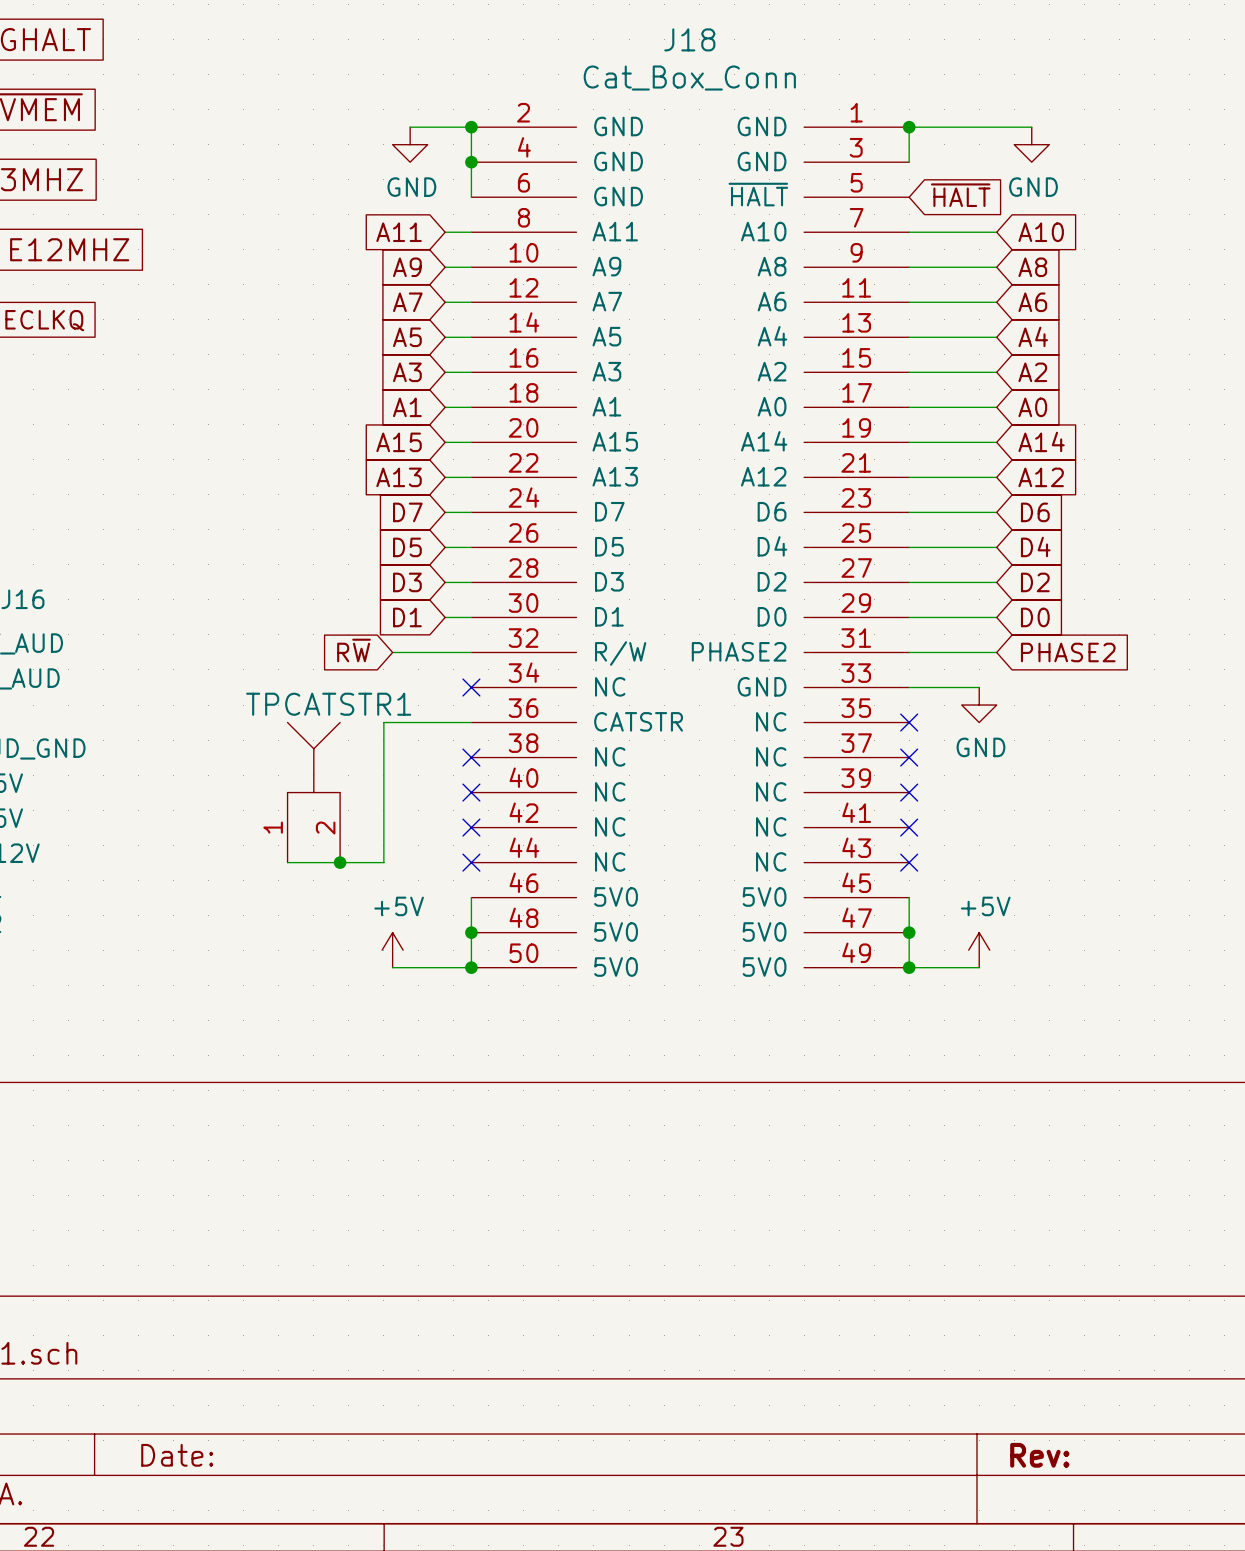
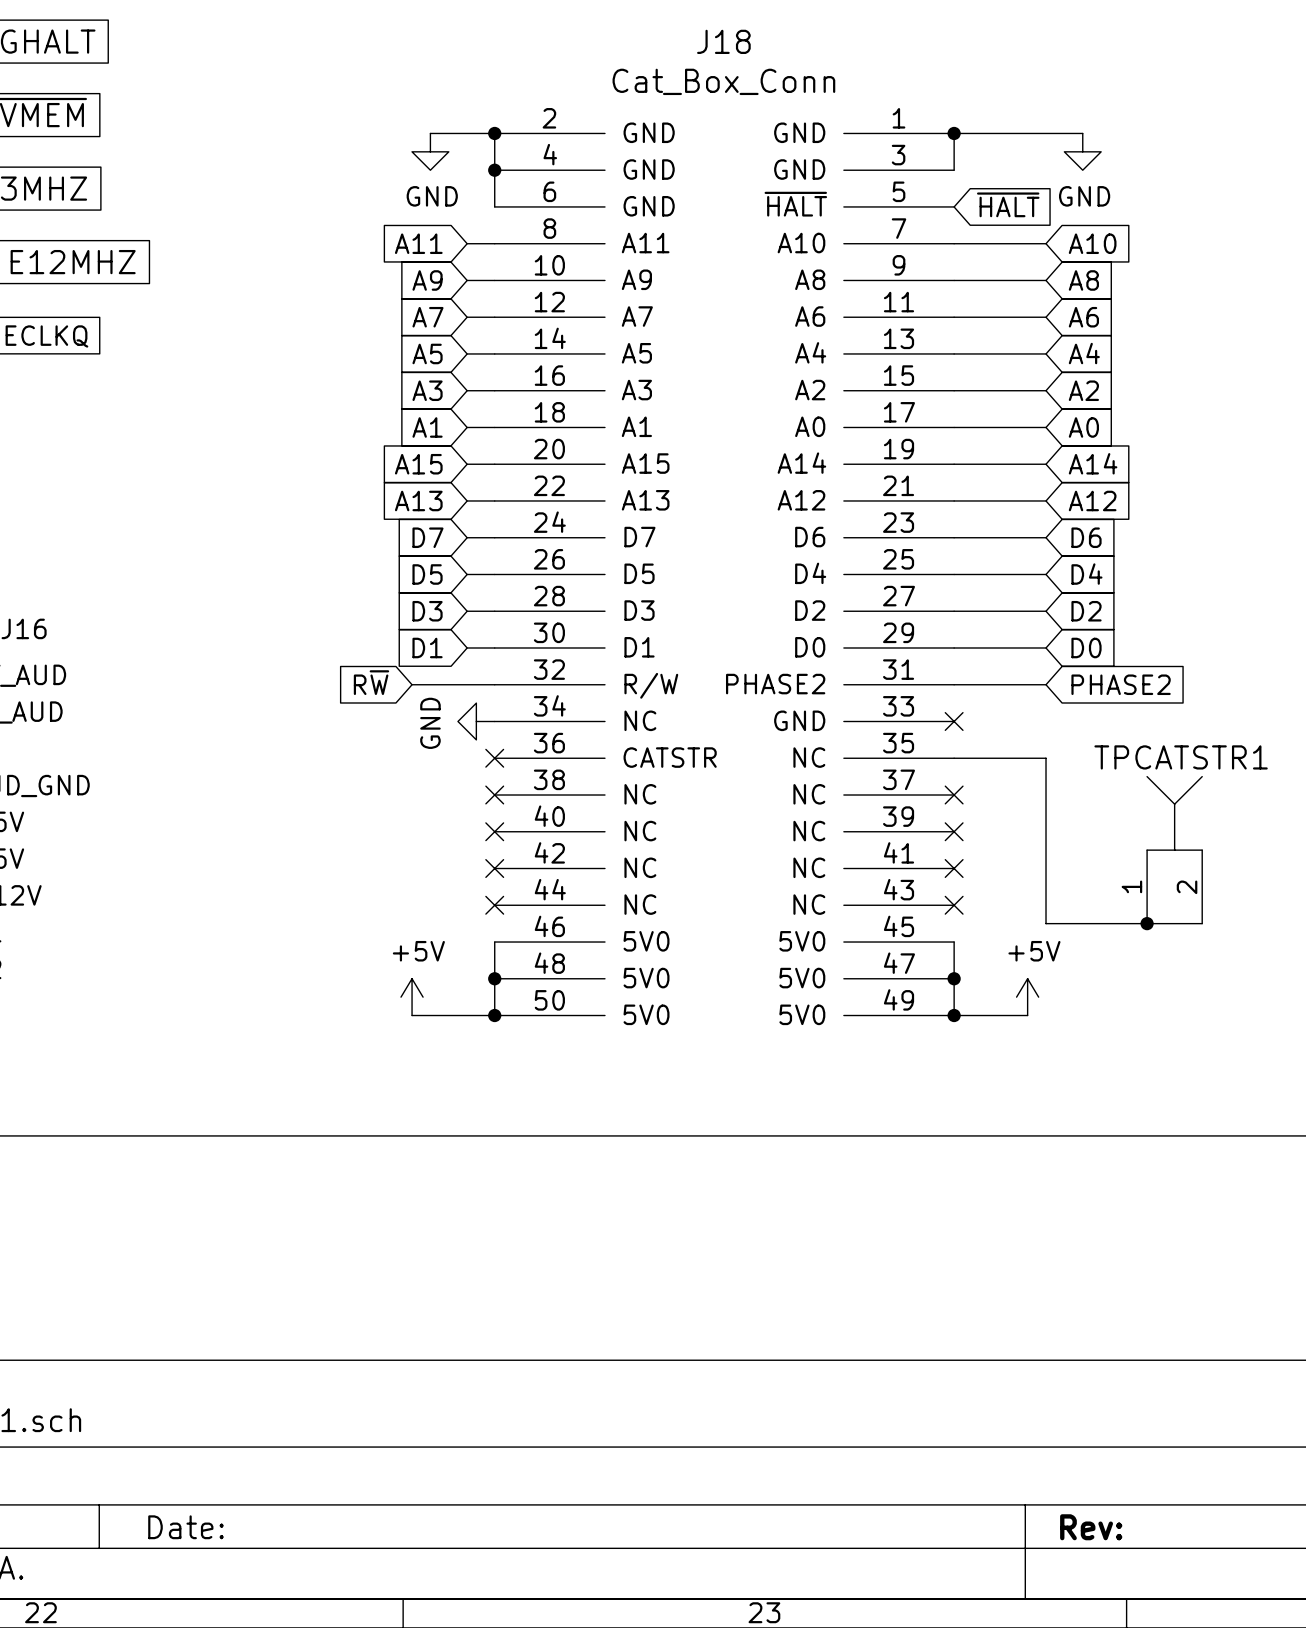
power symbol: none -> GND (476, 721)
no-connect mark position: (471, 687) -> (494, 758)
wire: (909, 687) (979, 687) -> none
TPCATSTR1 name position: TPCATSTR1 (328, 704) -> TPCATSTR1 (1181, 757)
power symbol: GND (979, 705) -> none
wire: (471, 722) (383, 722) (383, 862) (287, 862) -> none
wire: none -> (954, 758) (1046, 758) (1046, 923) (1202, 923)
no-connect mark position: (909, 722) -> (954, 721)
TPCATSTR1 position: (313, 792) -> (1174, 850)
junction: (340, 862) -> none
junction: none -> (1147, 923)

